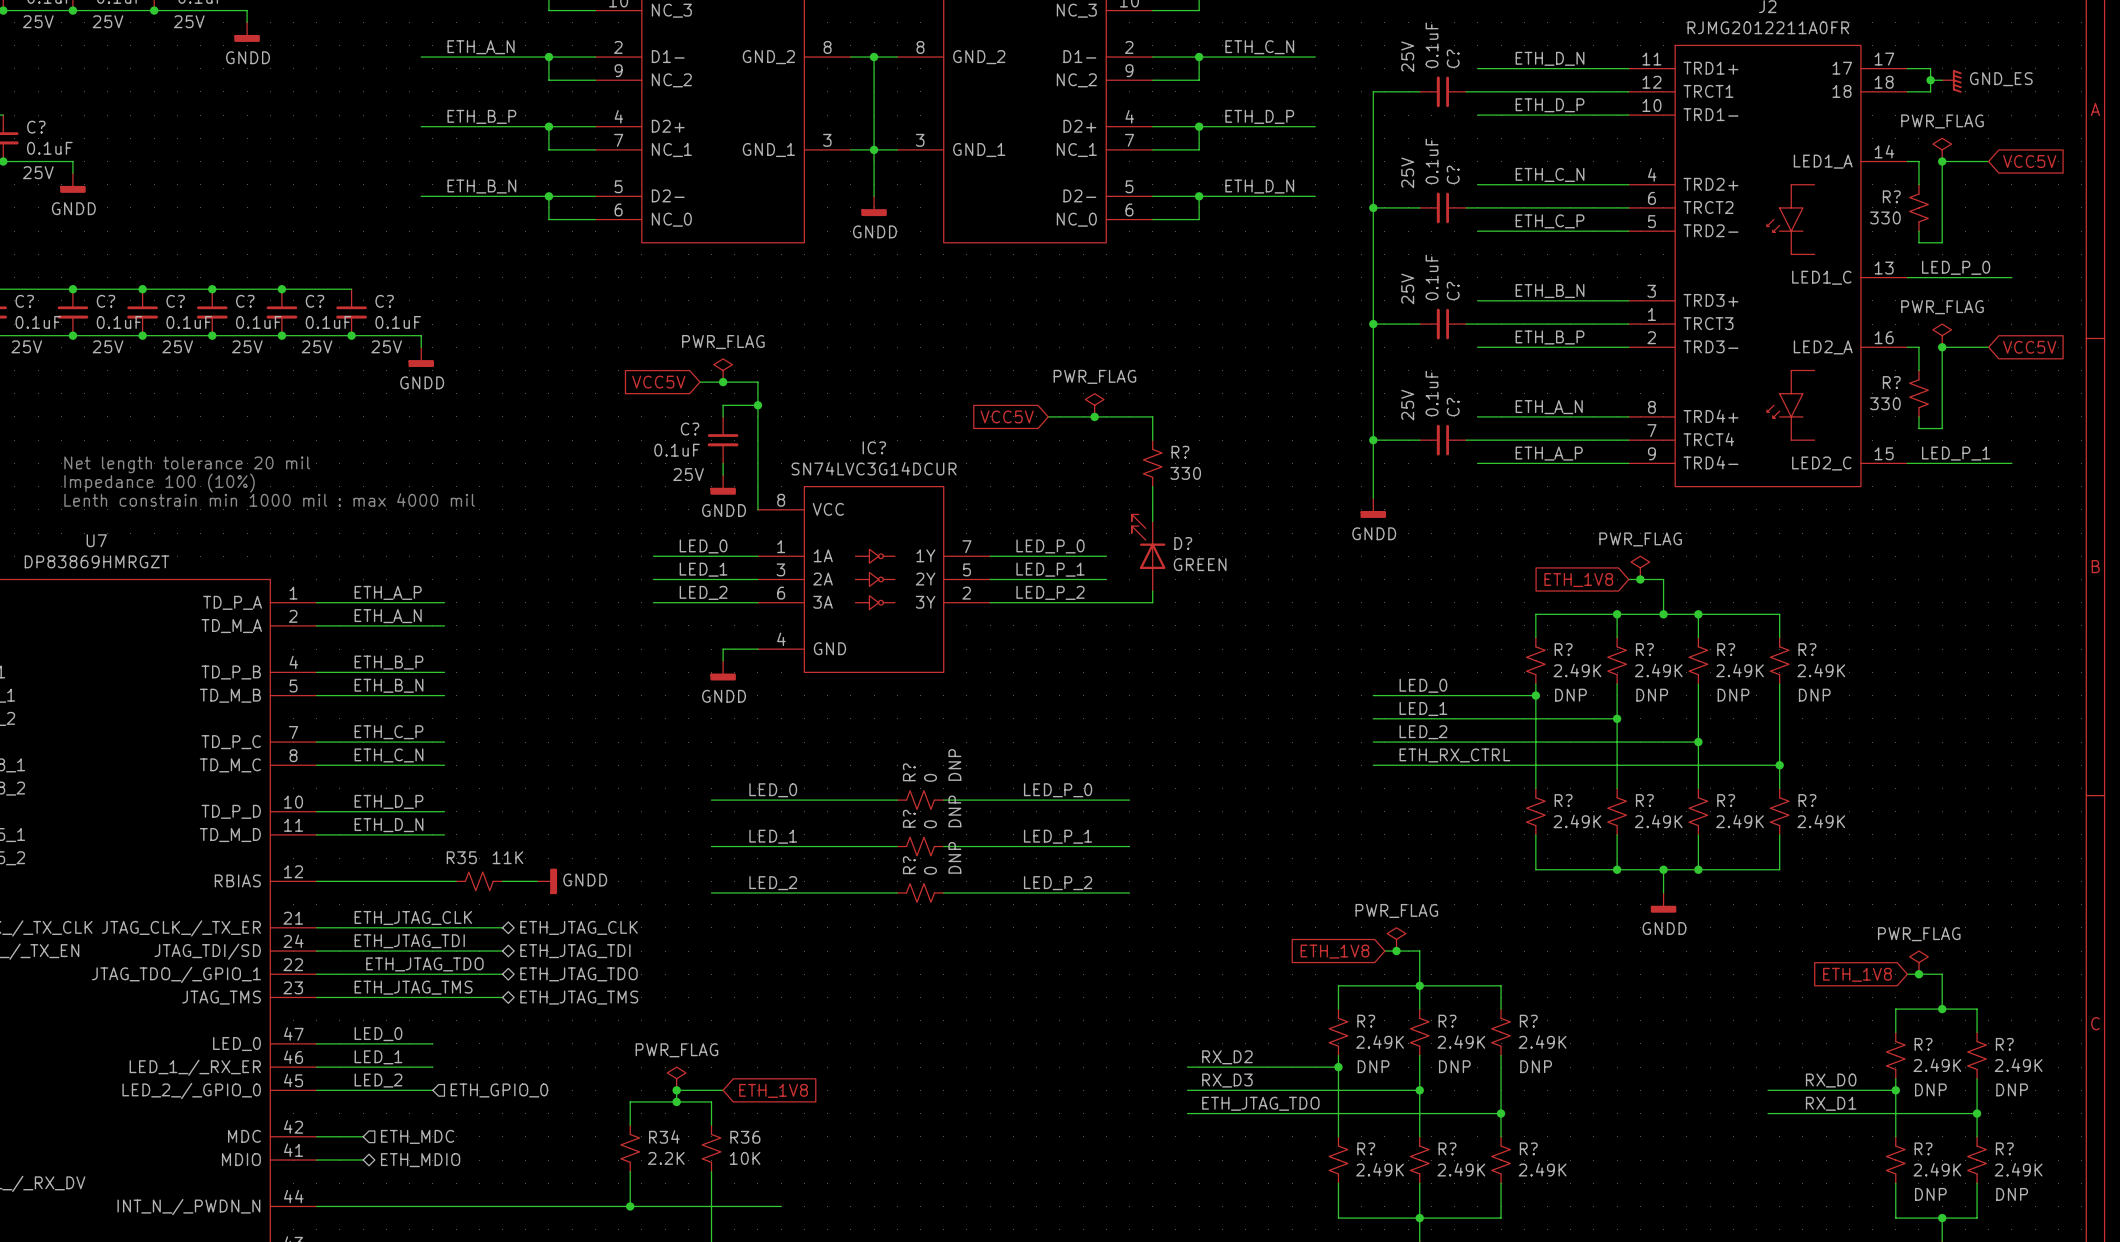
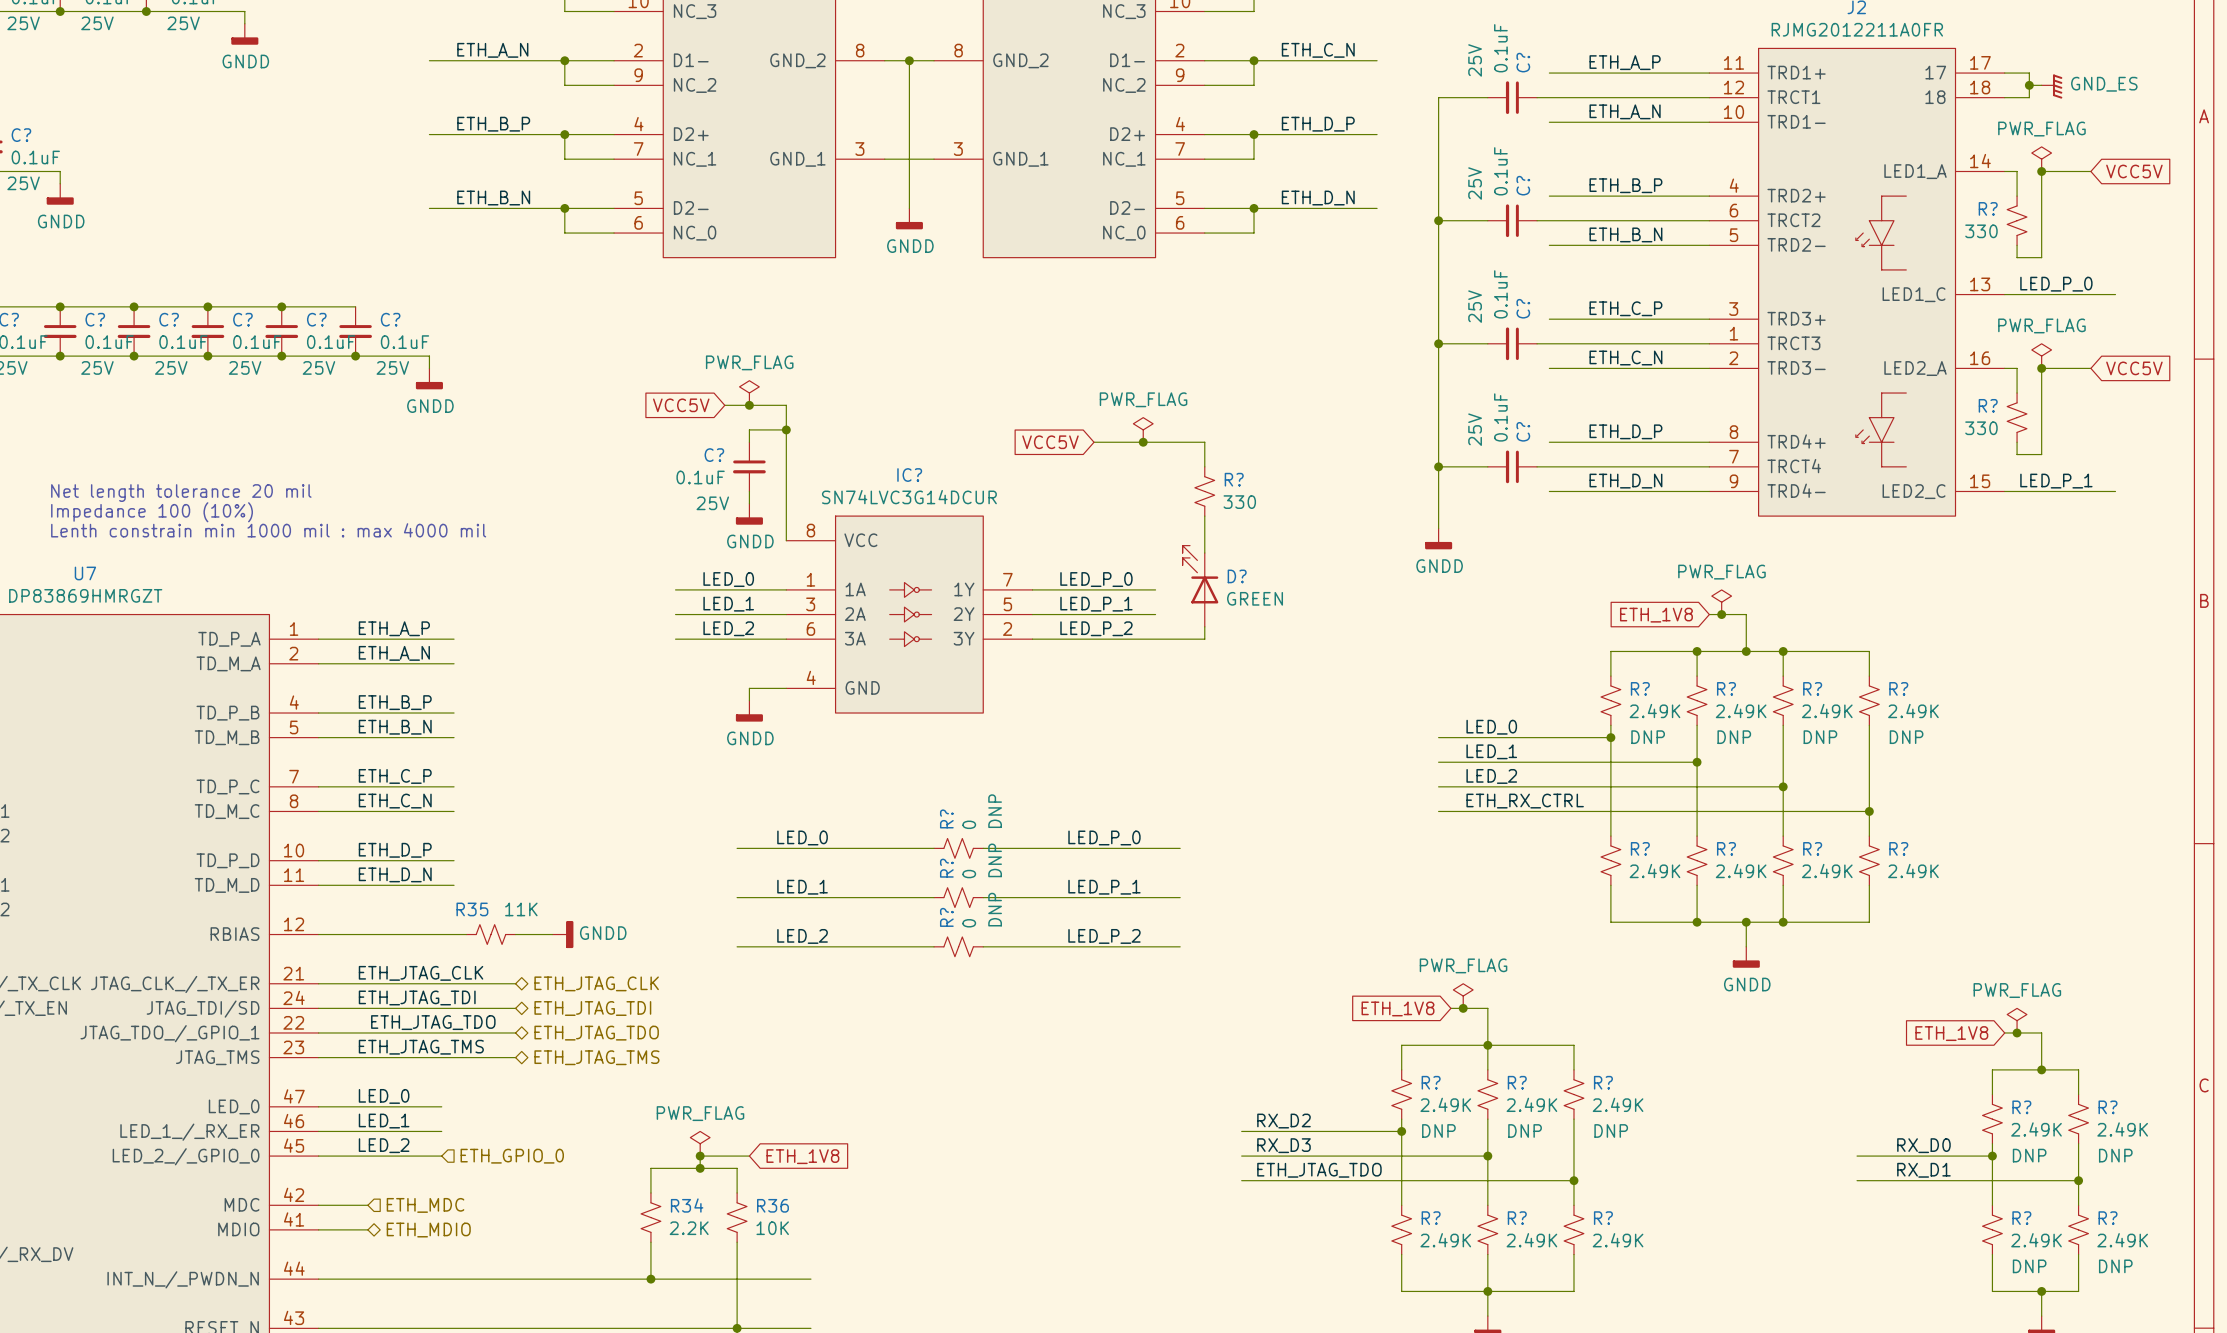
label: ETH_D_N (1550, 58) -> ETH_A_P (1625, 62)
label: ETH_D_P (1550, 105) -> ETH_A_N (1625, 111)
junction: (874, 149) -> none
label: ETH_C_N (1550, 174) -> ETH_B_P (1625, 185)
label: ETH_C_P (1550, 221) -> ETH_B_N (1625, 234)
label: ETH_B_N (1550, 291) -> ETH_C_P (1625, 308)
label: ETH_B_P (1550, 337) -> ETH_C_N (1625, 358)
label: ETH_A_N (1549, 407) -> ETH_D_P (1625, 431)
label: ETH_A_P (1549, 453) -> ETH_D_N (1625, 481)

